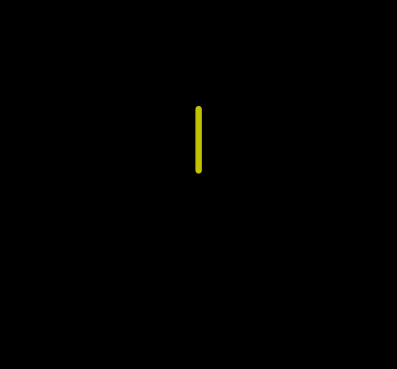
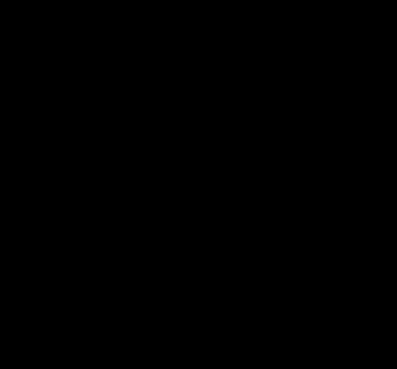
board edge: (198, 109) (198, 170) -> none

